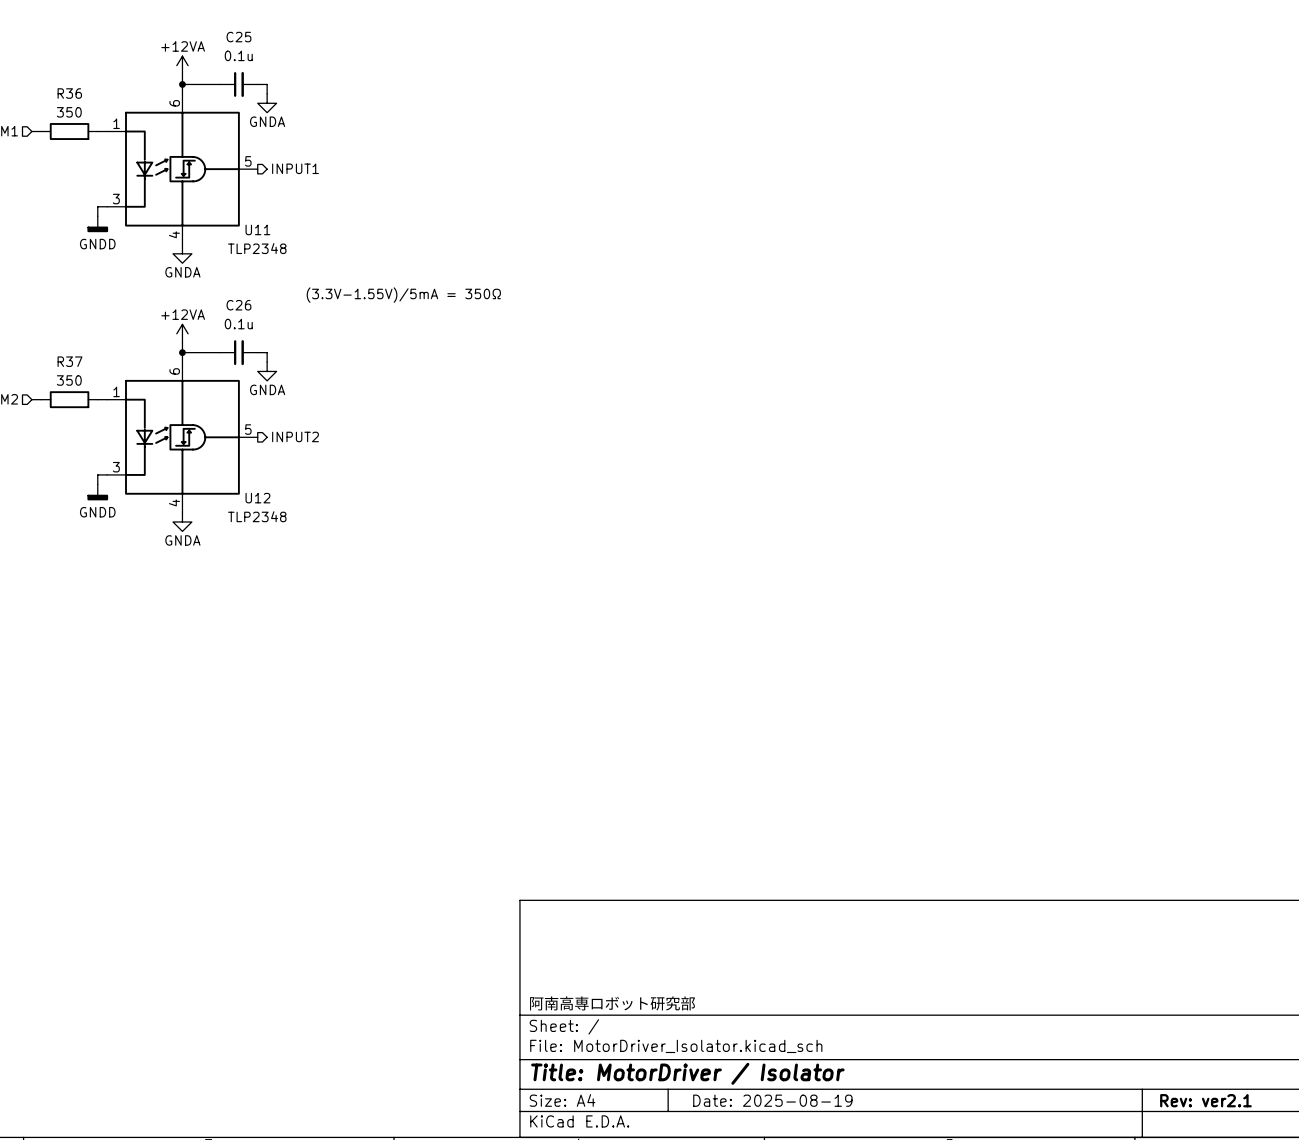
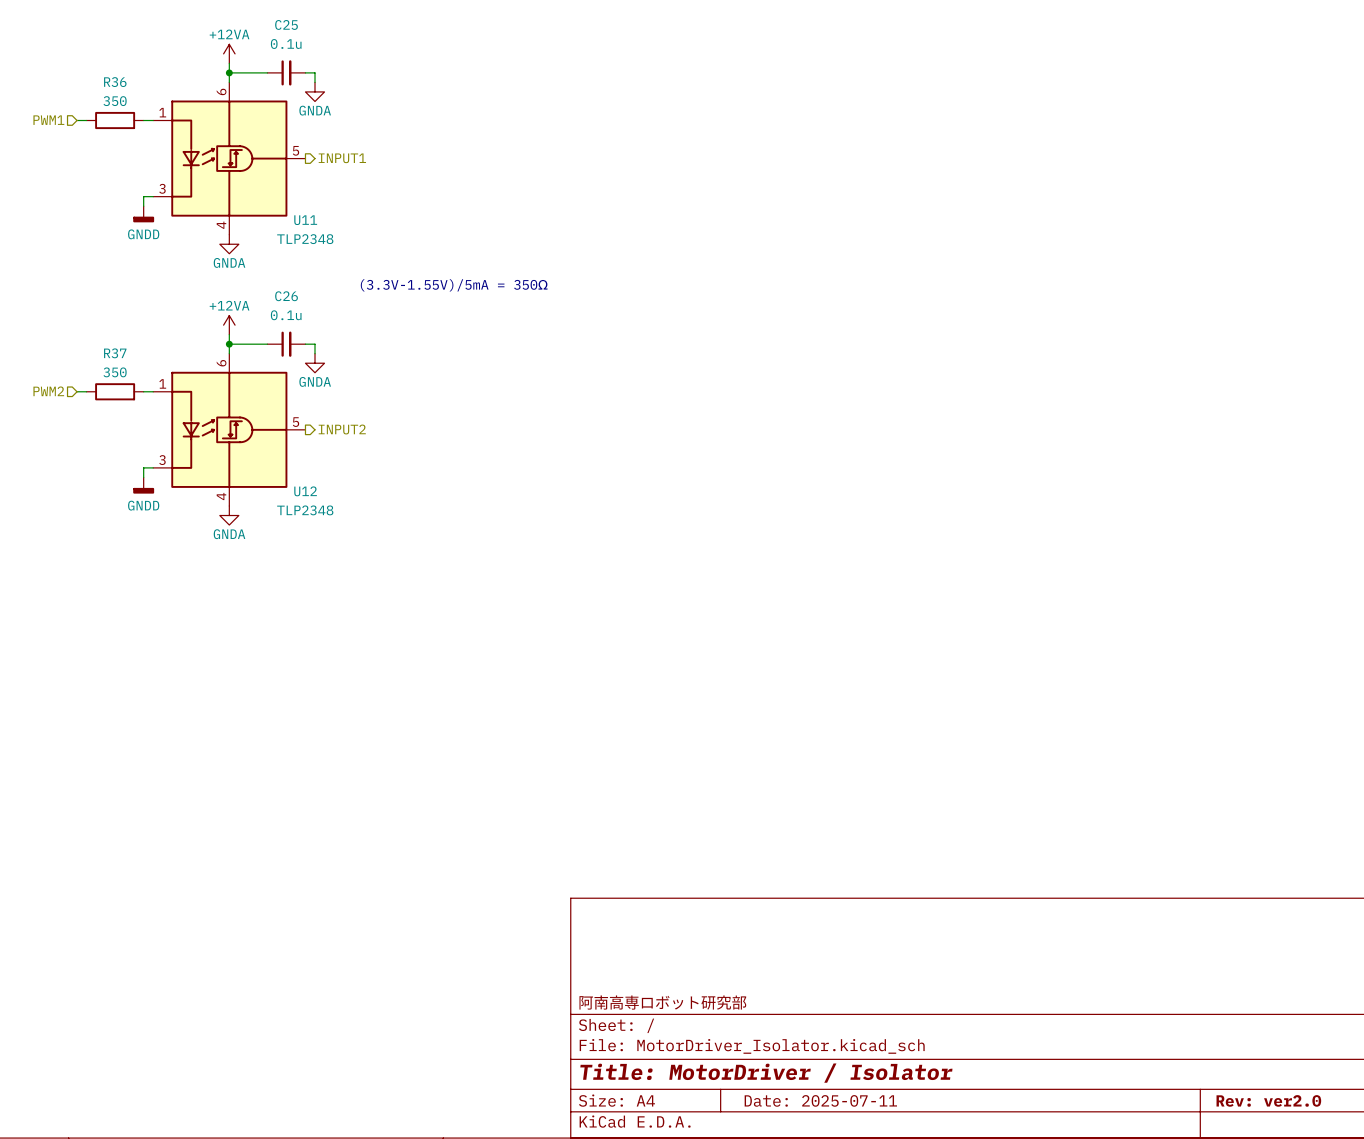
title block: Date: 2025-08-19 (772, 1100) -> Date: 2025-07-11 (820, 1100)
title block: Rev: ver2.1 (1205, 1100) -> Rev: ver2.0 (1268, 1100)

